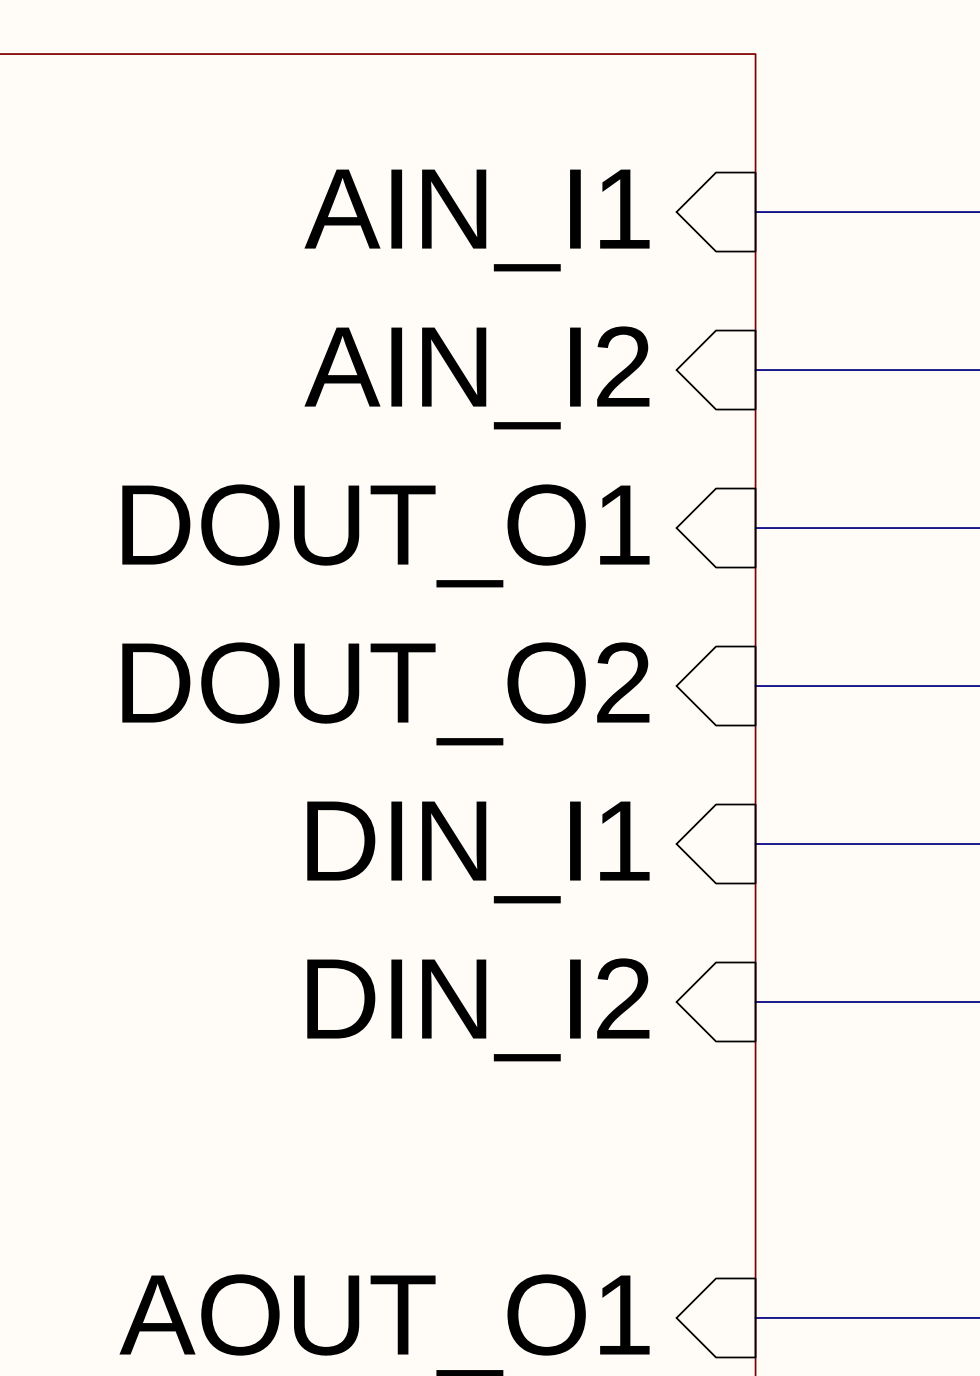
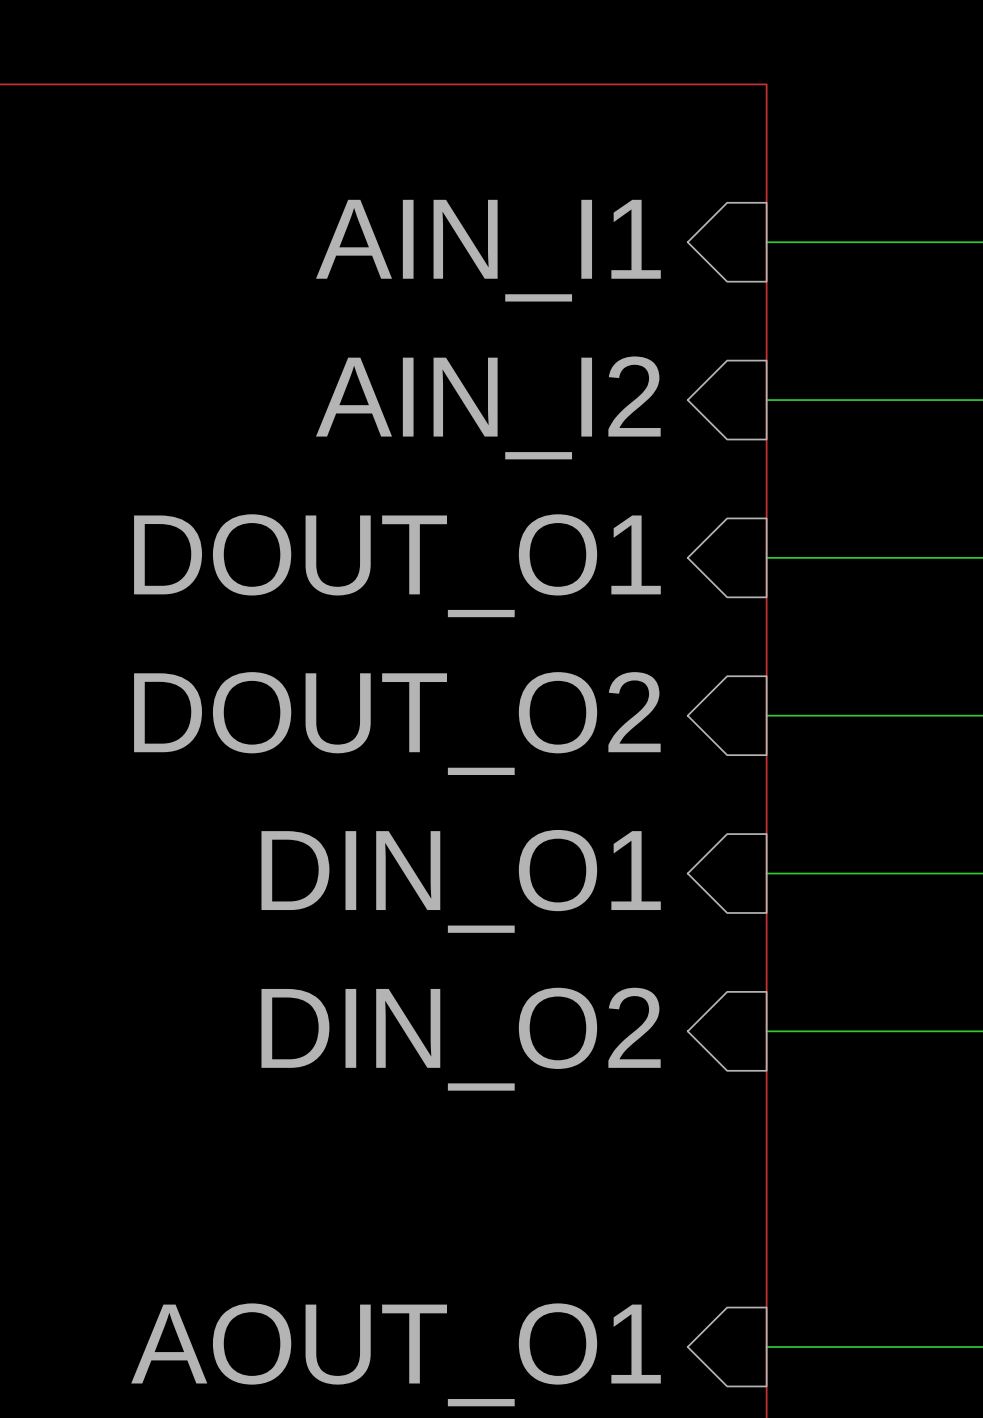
sheet pin: DIN_I1 (478, 852) -> DIN_O1 (461, 881)
sheet pin: DIN_I2 (478, 1009) -> DIN_O2 (461, 1039)

